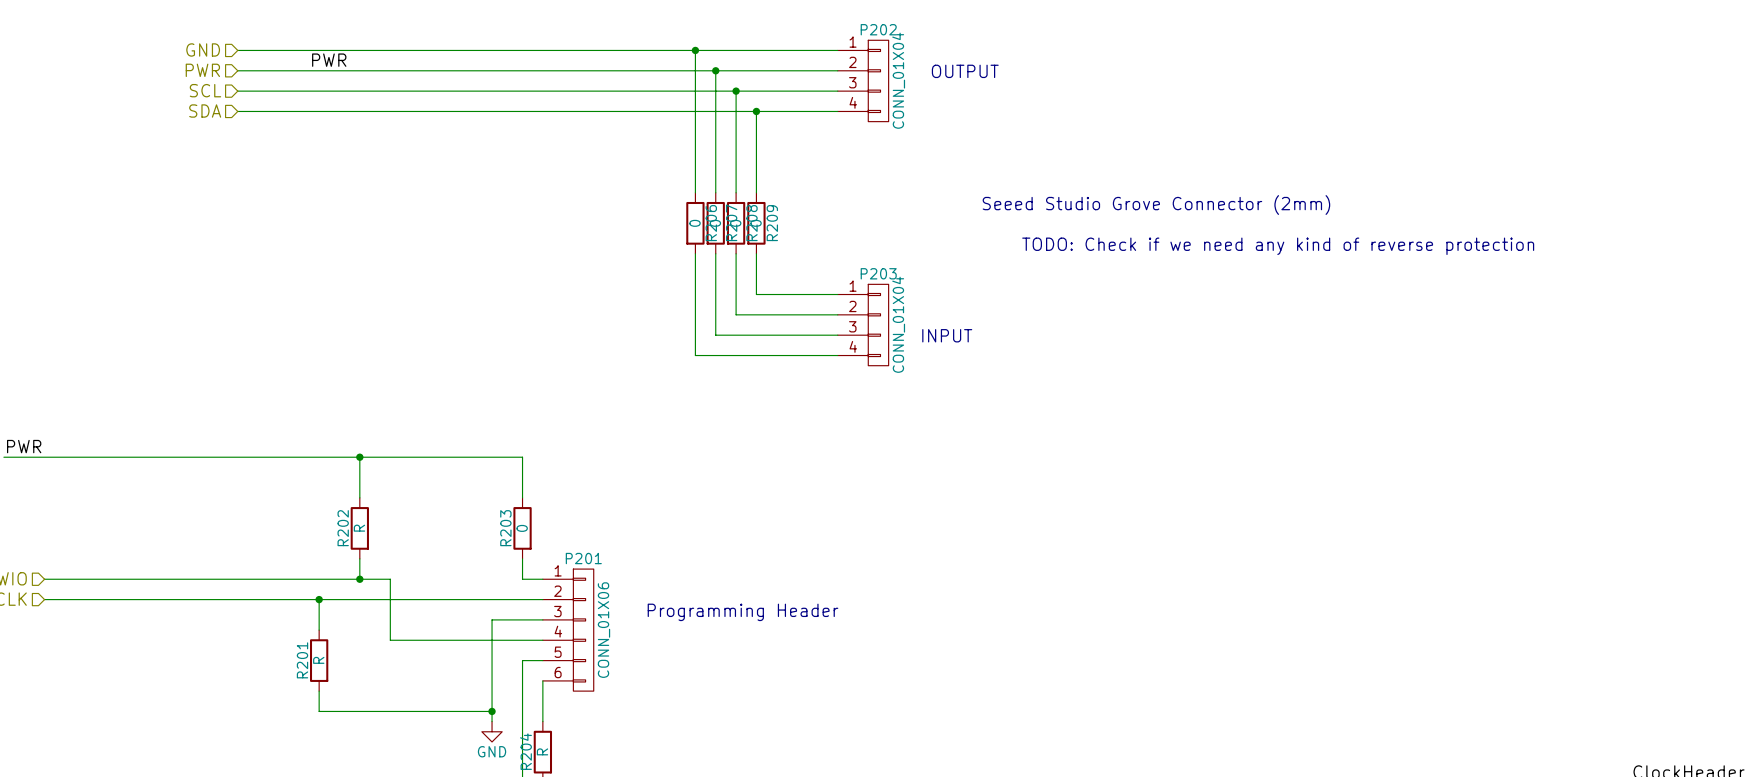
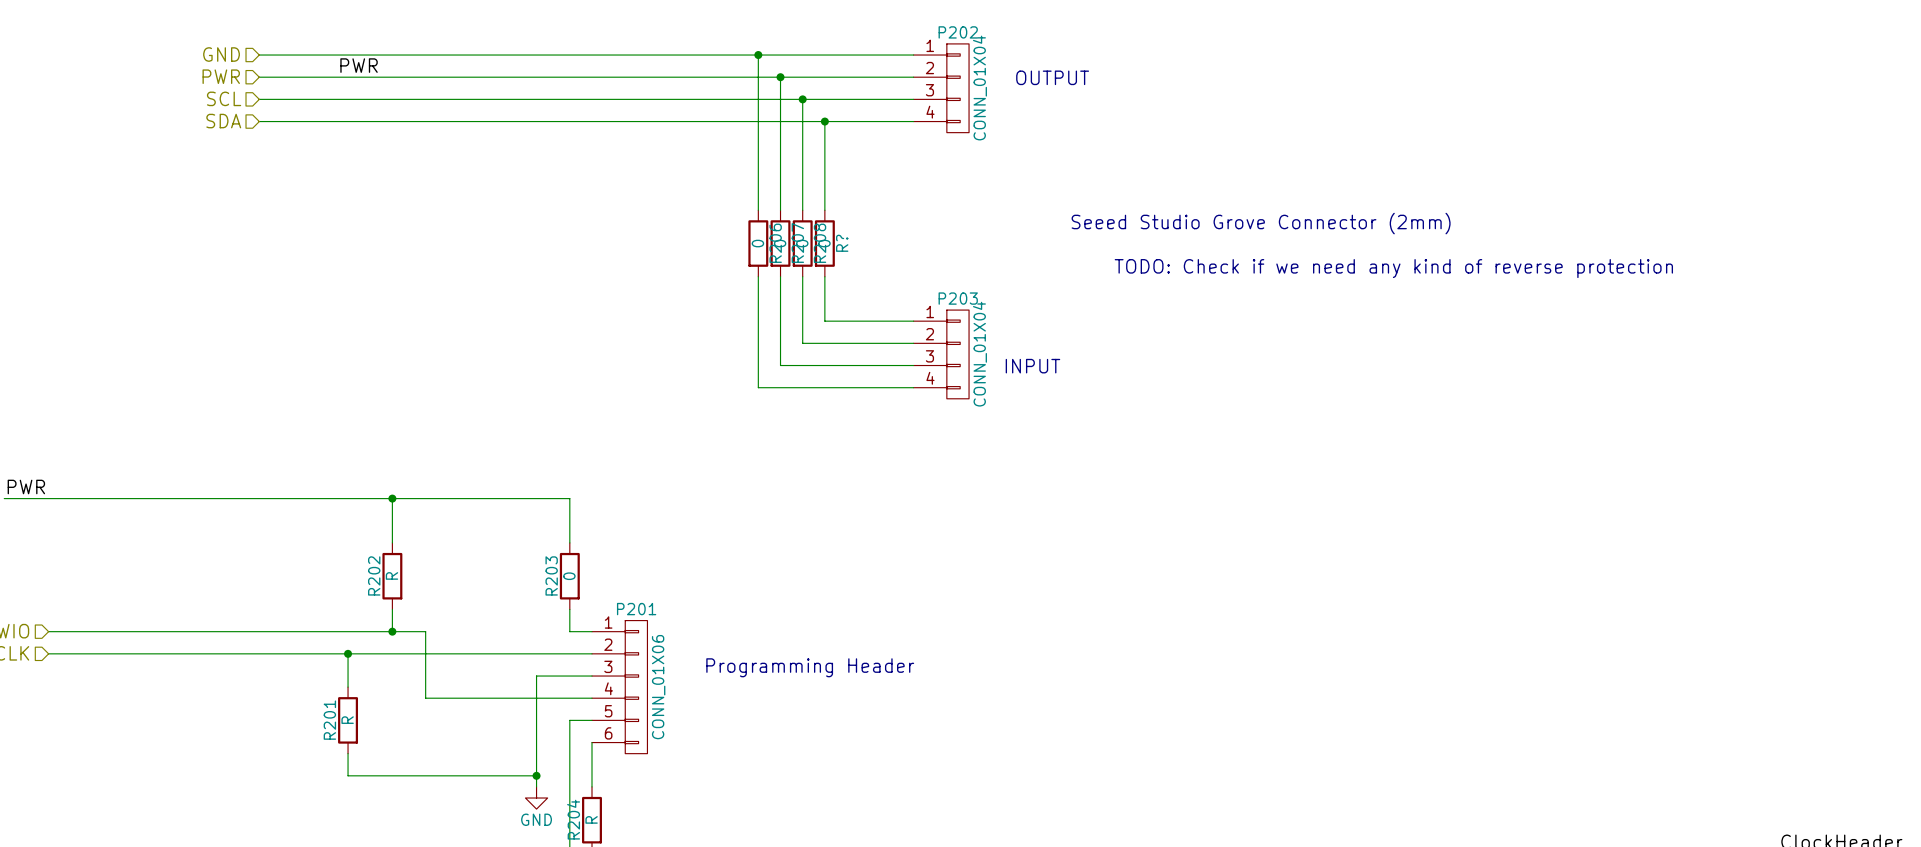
R209 name: R209 (772, 223) -> R? (842, 243)

